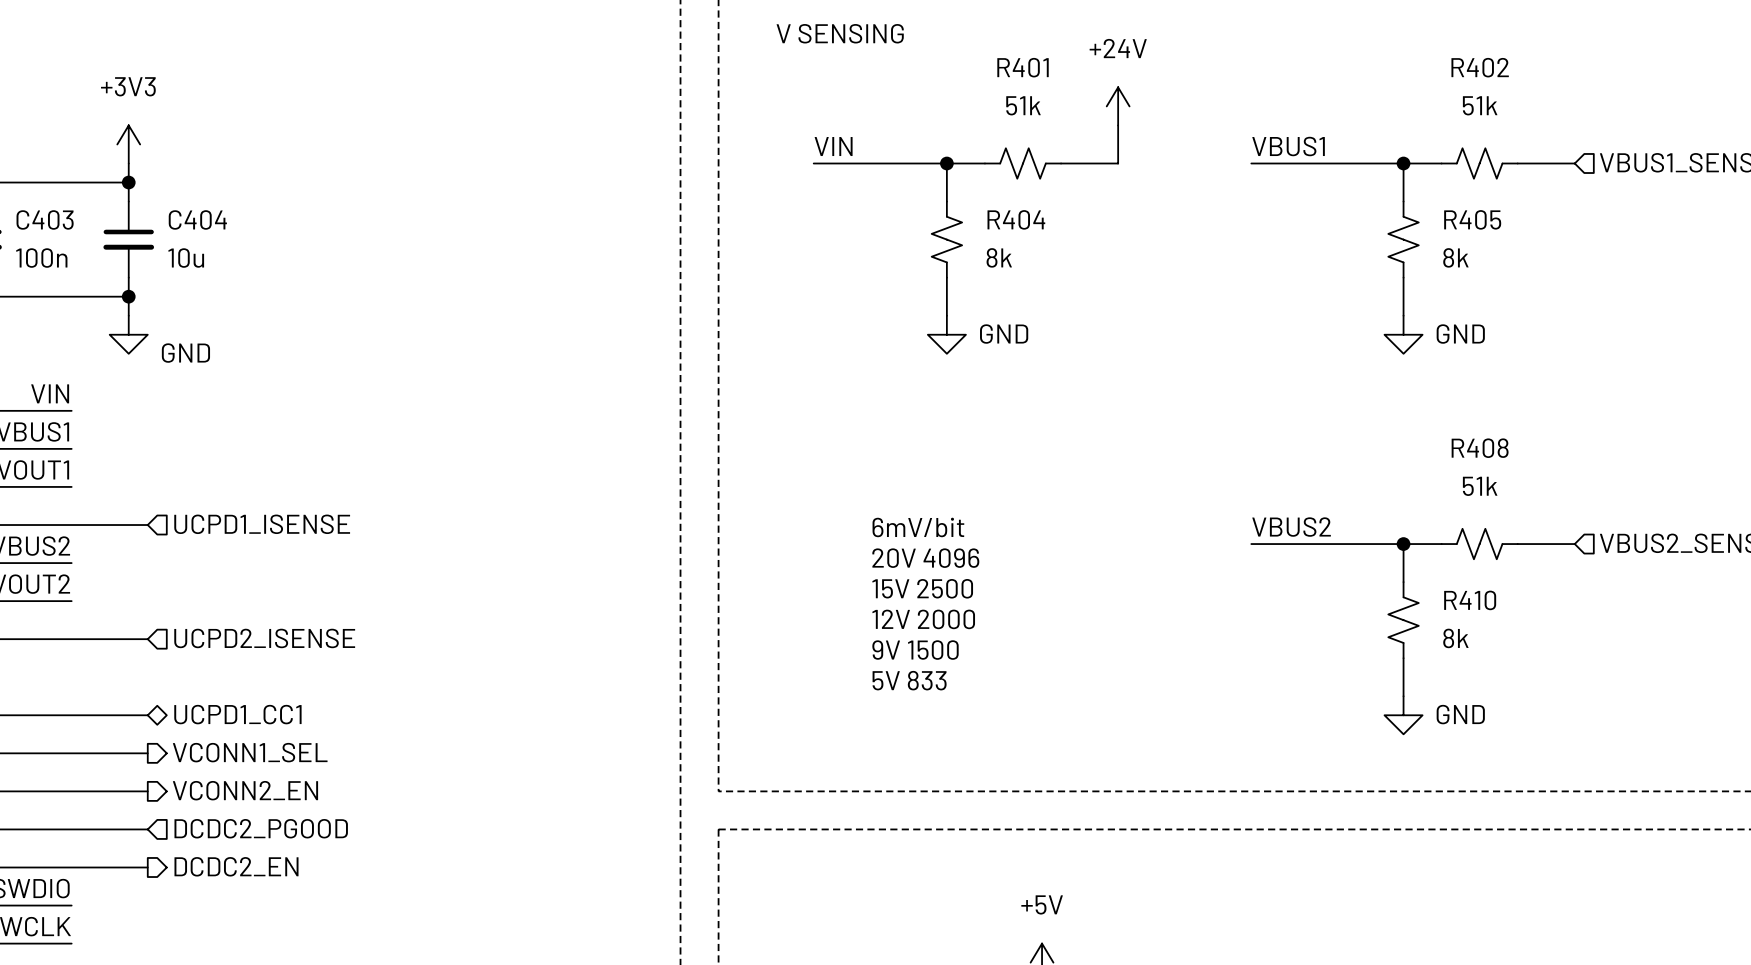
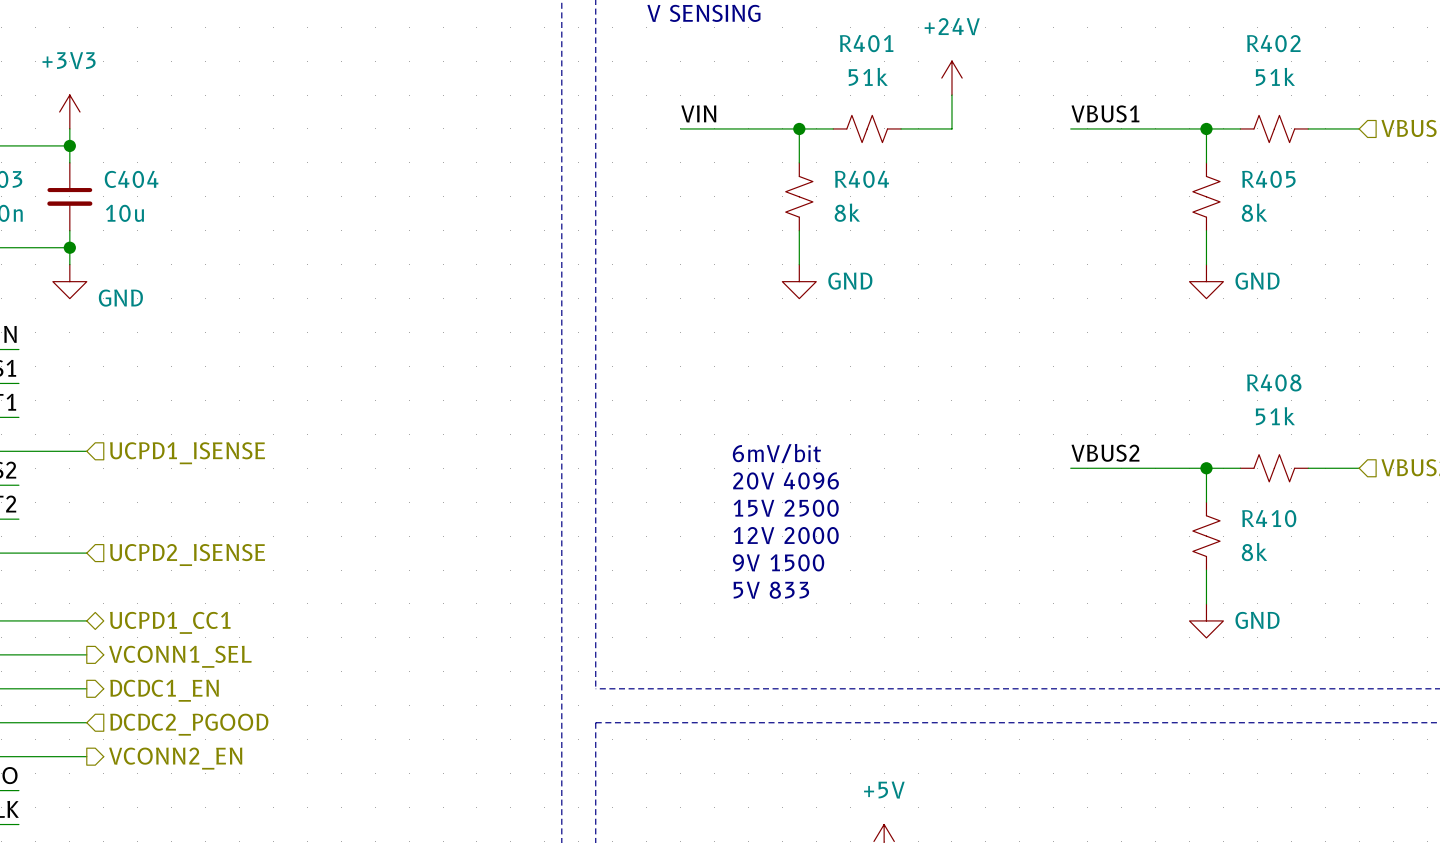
hierarchical label: VCONN2_EN (245, 790) -> DCDC1_EN (164, 690)
hierarchical label: DCDC2_EN (236, 866) -> VCONN2_EN (175, 758)

